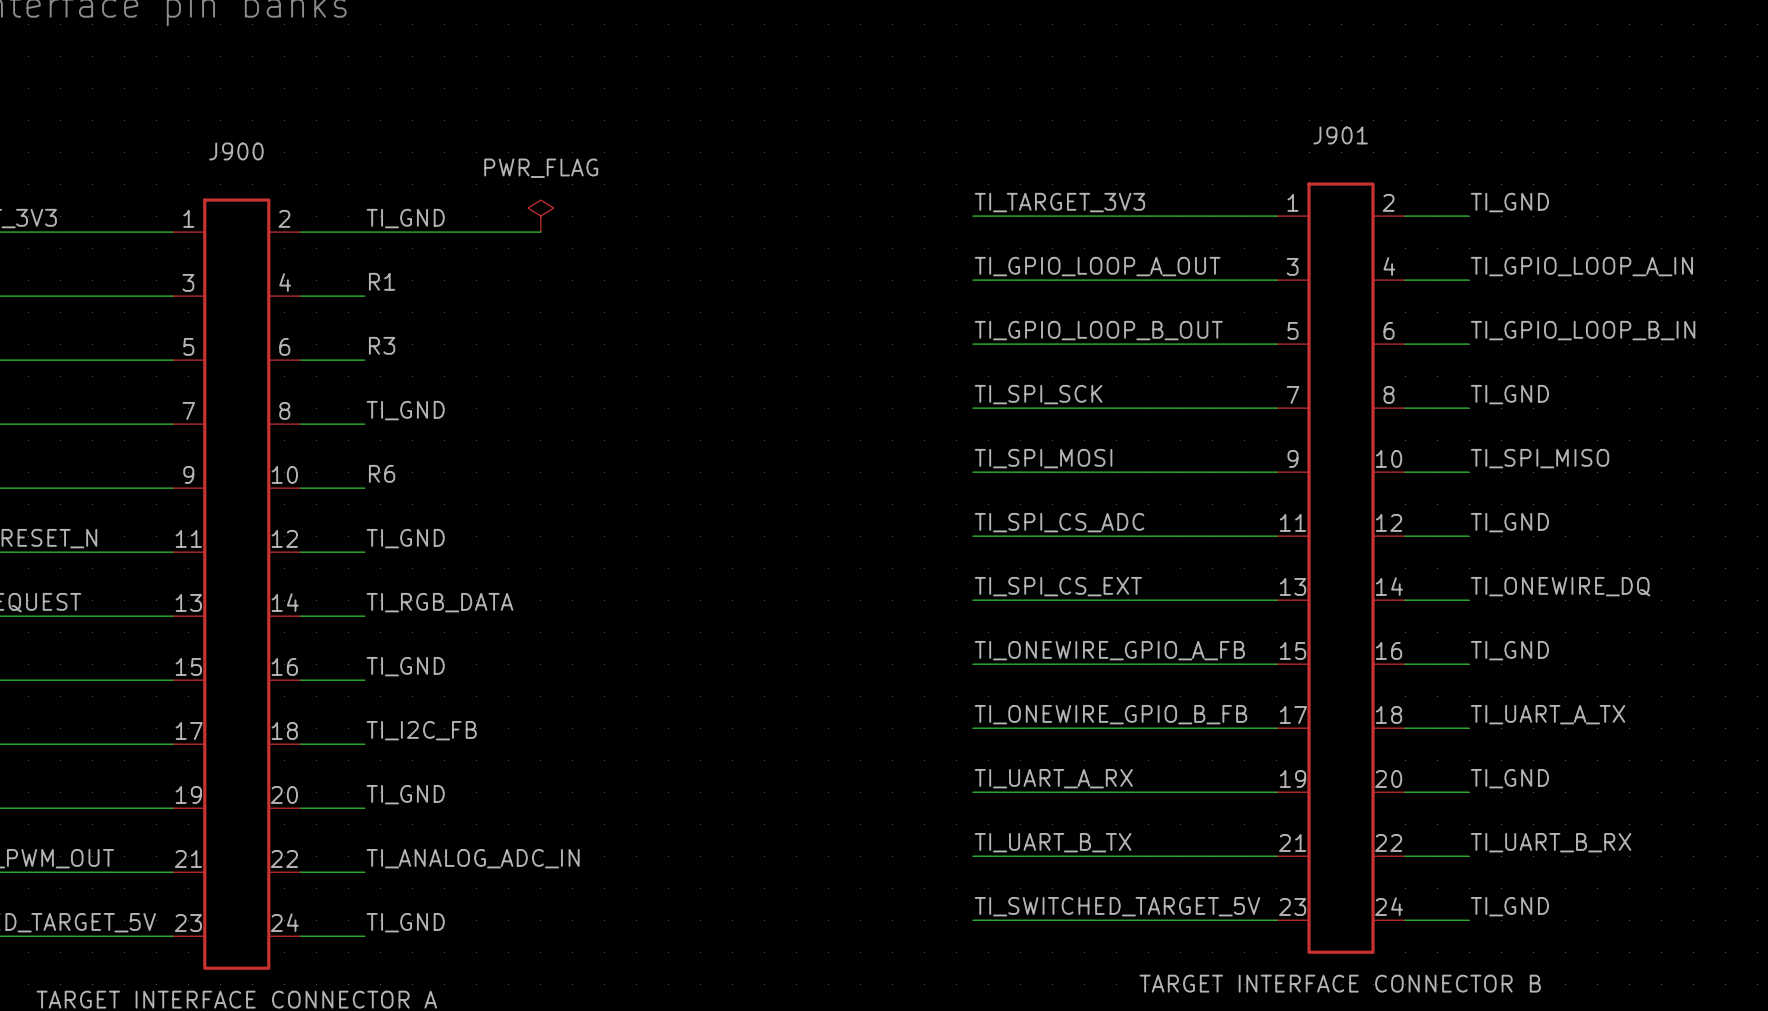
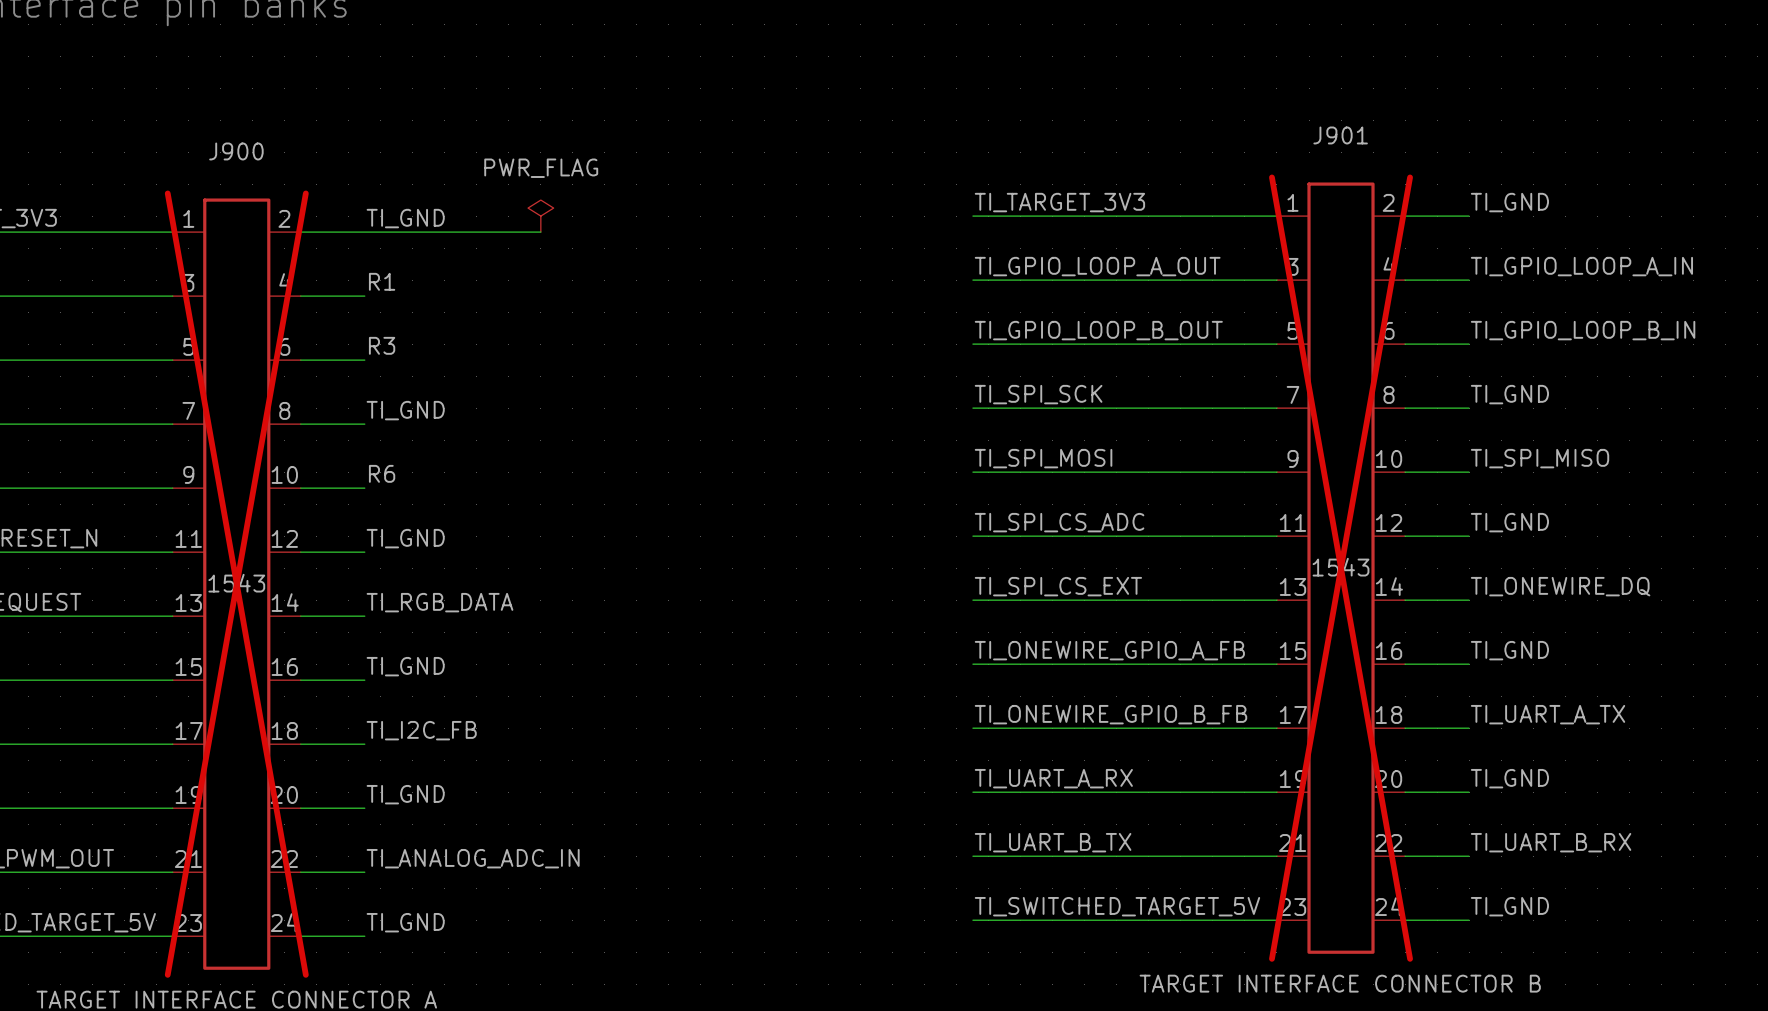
J901 text: none -> 1543 (1341, 567)
J901 do-not-place cross: none -> (1341, 568)
J900 text: none -> 1543 (236, 583)
J900 do-not-place cross: none -> (236, 584)

